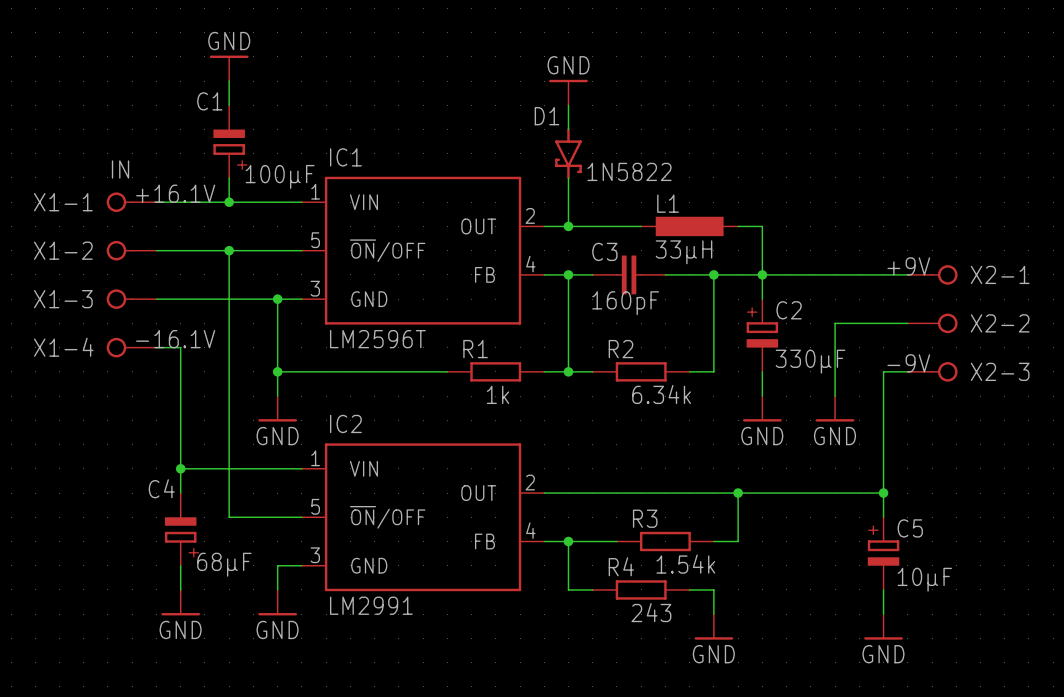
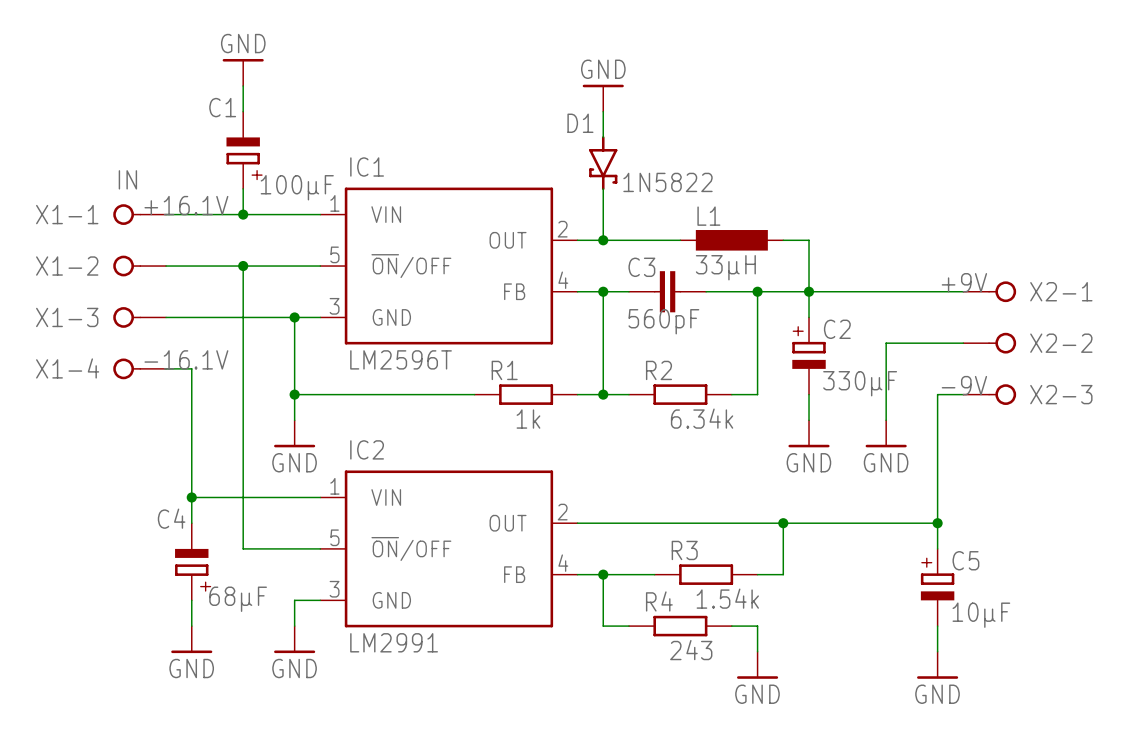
C3 value: 160pF (625, 303) -> 560pF (663, 321)

